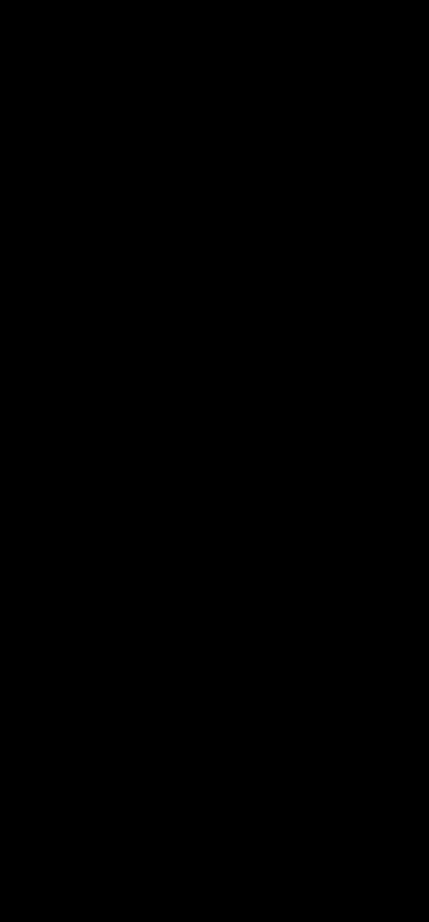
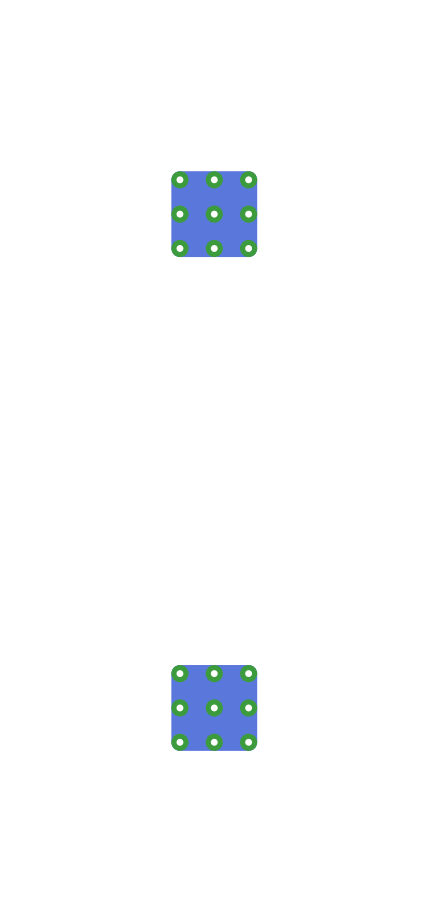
part: none -> (214, 214)
part: none -> (214, 707)

